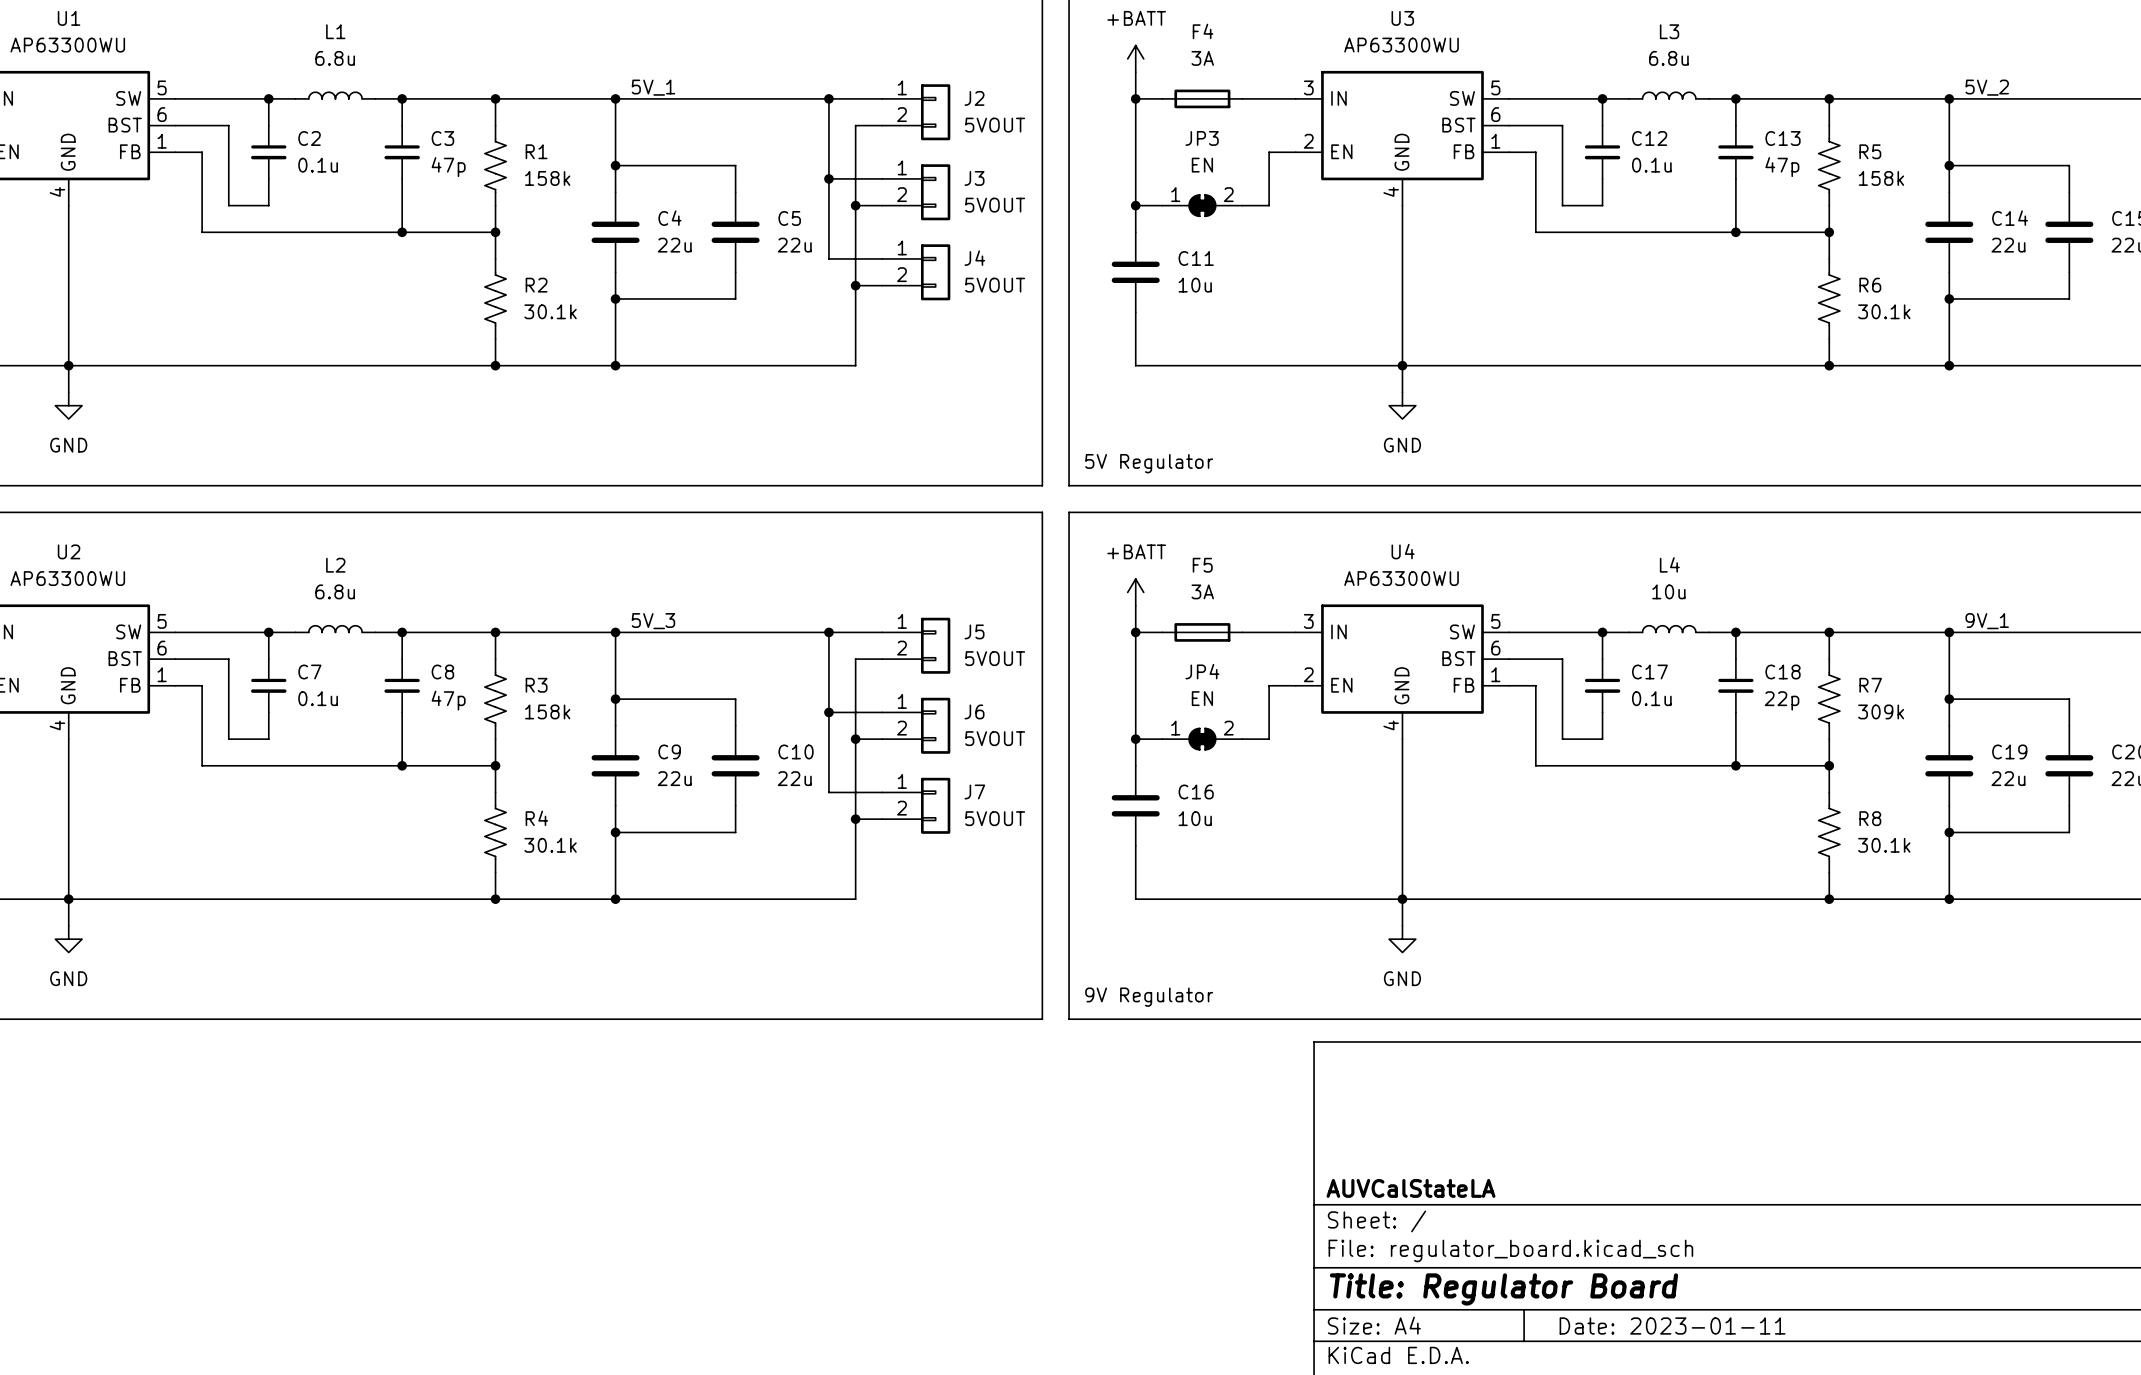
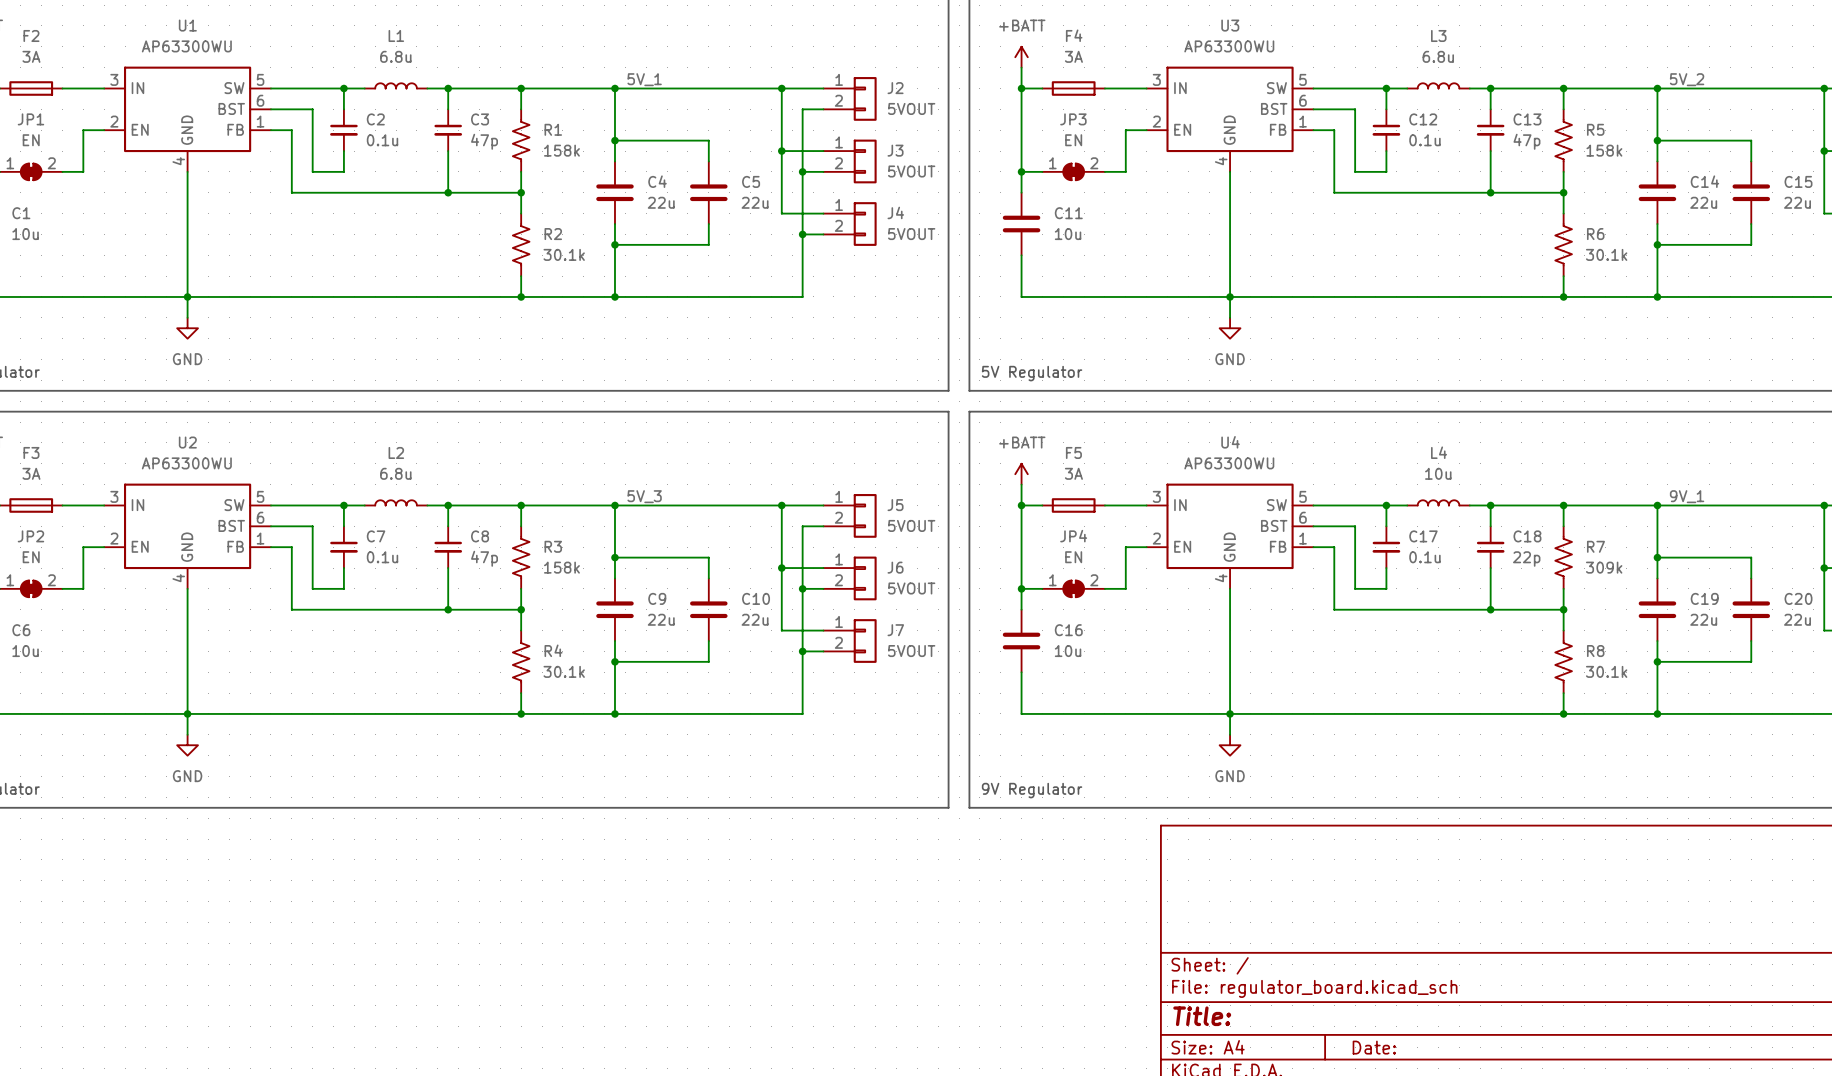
title block: AUVCalStateLA (1411, 1188) -> none
title block: Title: Regulator Board (1503, 1289) -> Title: (1202, 1016)
title block: Date: 2023-01-11 (1672, 1326) -> Date: (1374, 1047)

